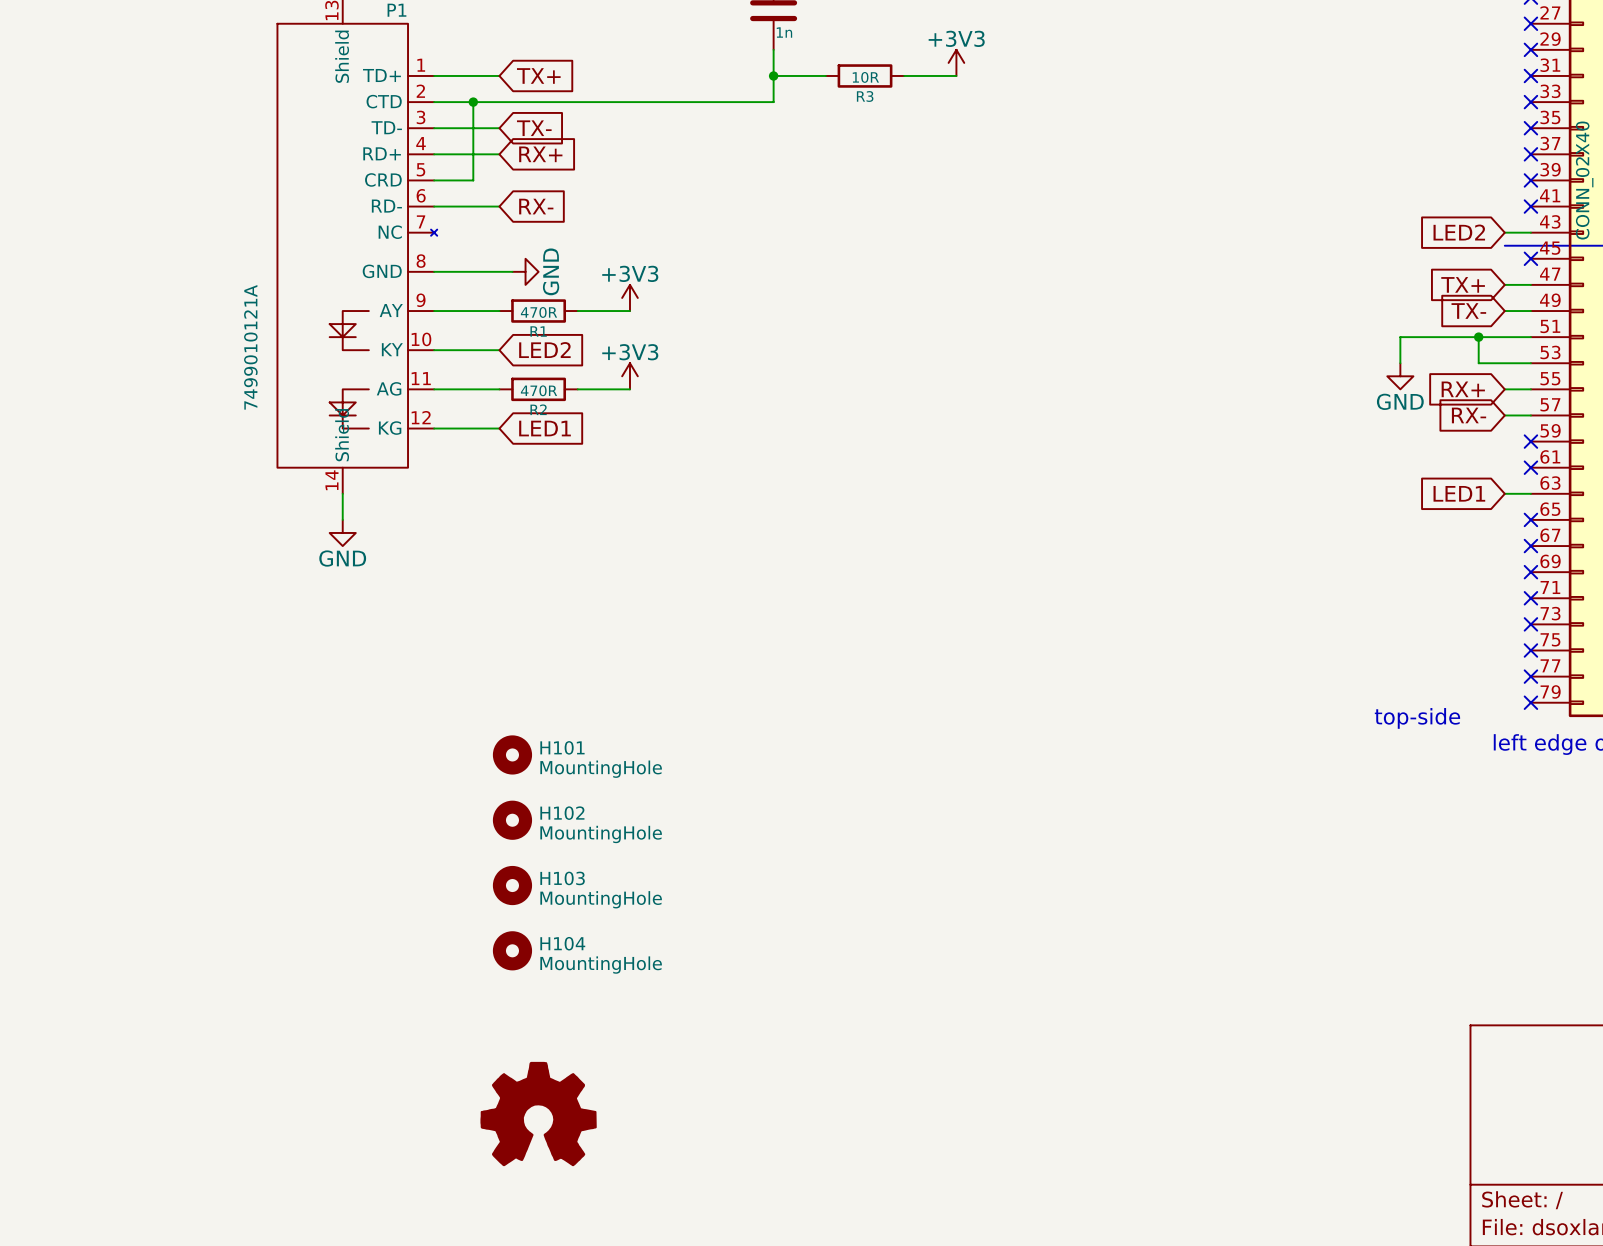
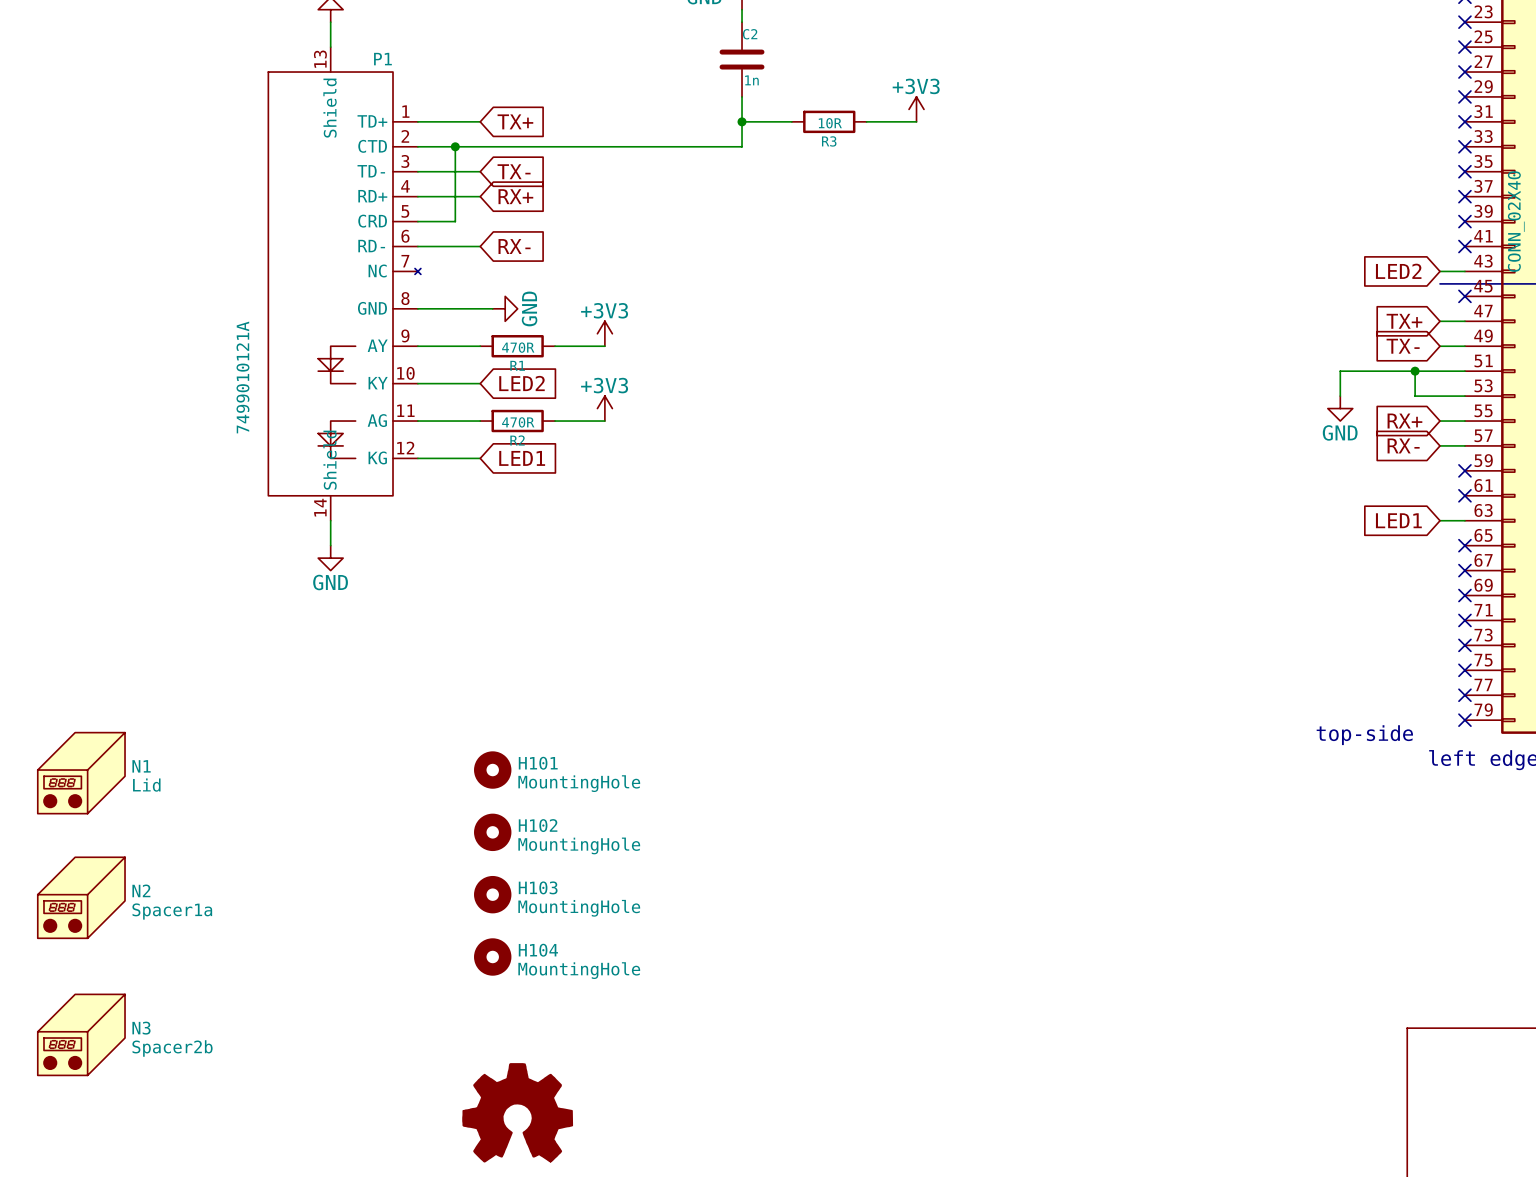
N1: none -> Lid (81, 773)
N2: none -> Spacer1a (81, 897)
N3: none -> Spacer2b (81, 1034)

